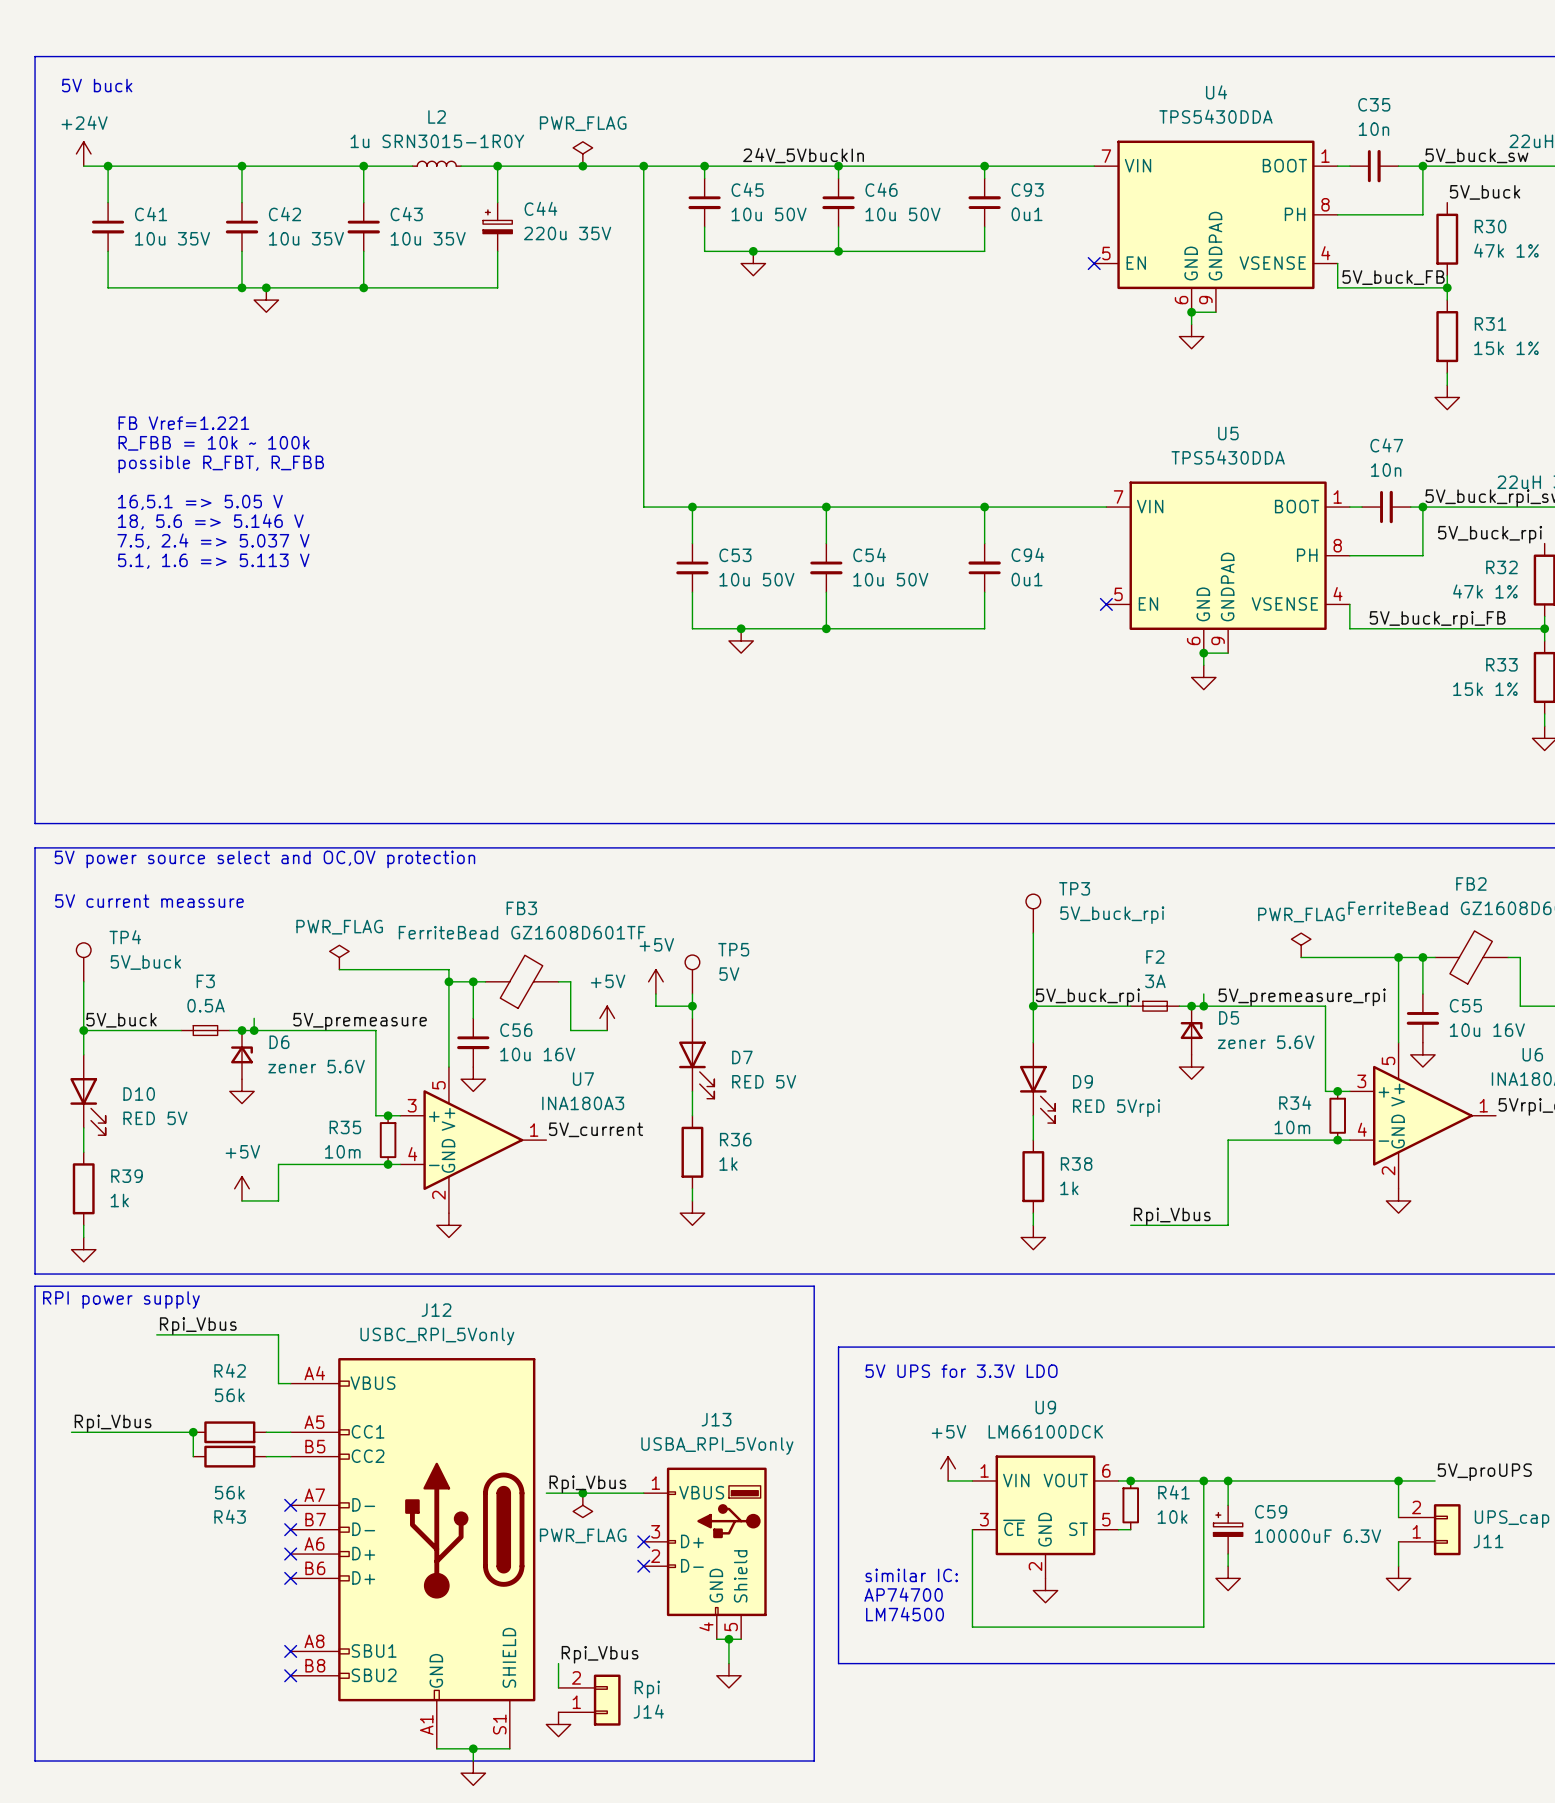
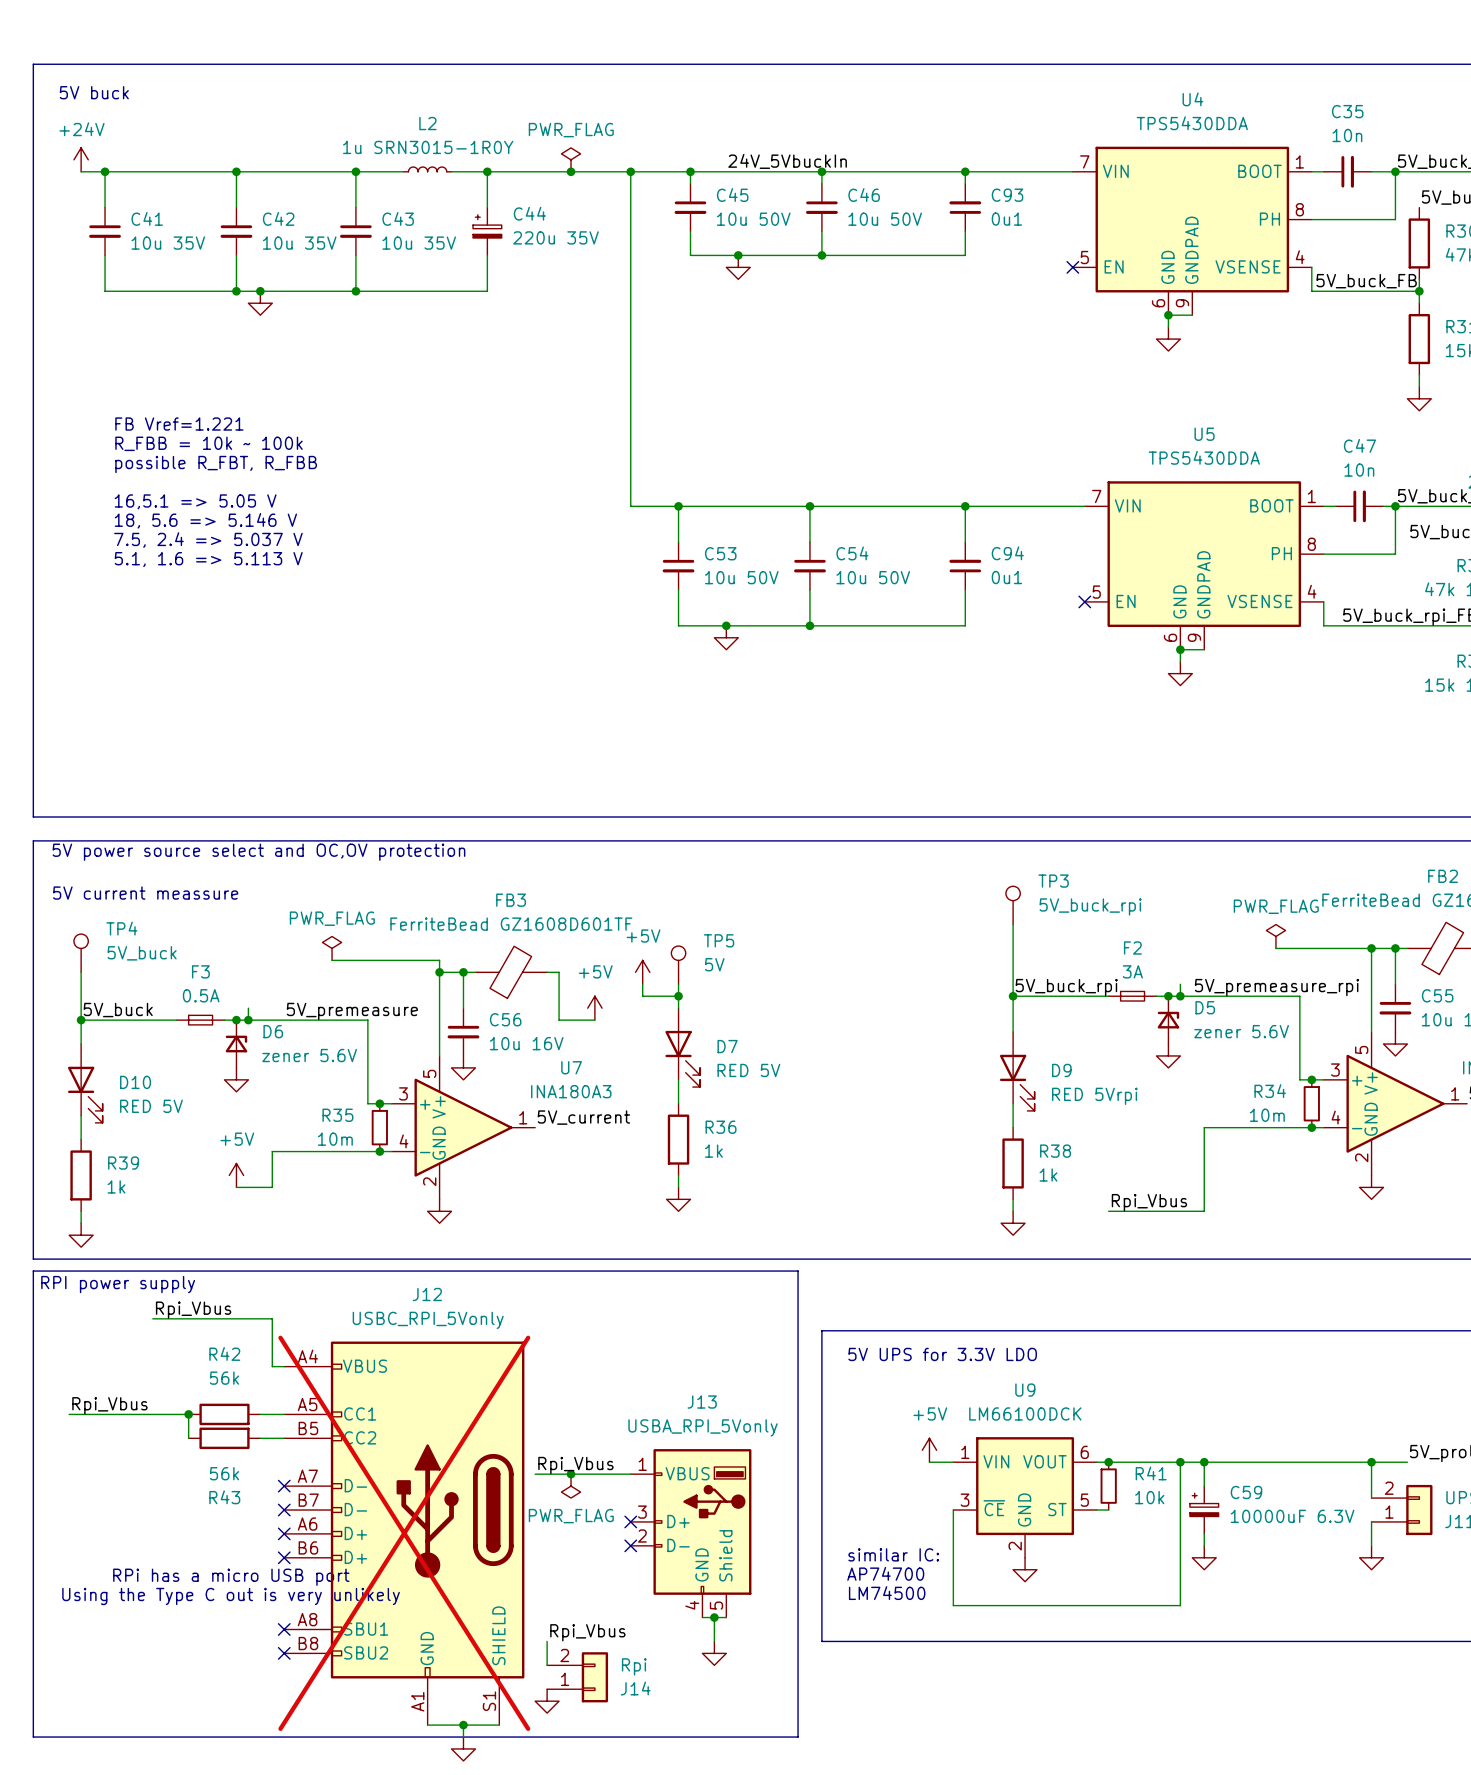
J12 do-not-place cross: none -> (404, 1533)
text: none -> RPi has a micro USB port (231, 1577)
text: none -> Using the Type C out is very unlikely (231, 1596)

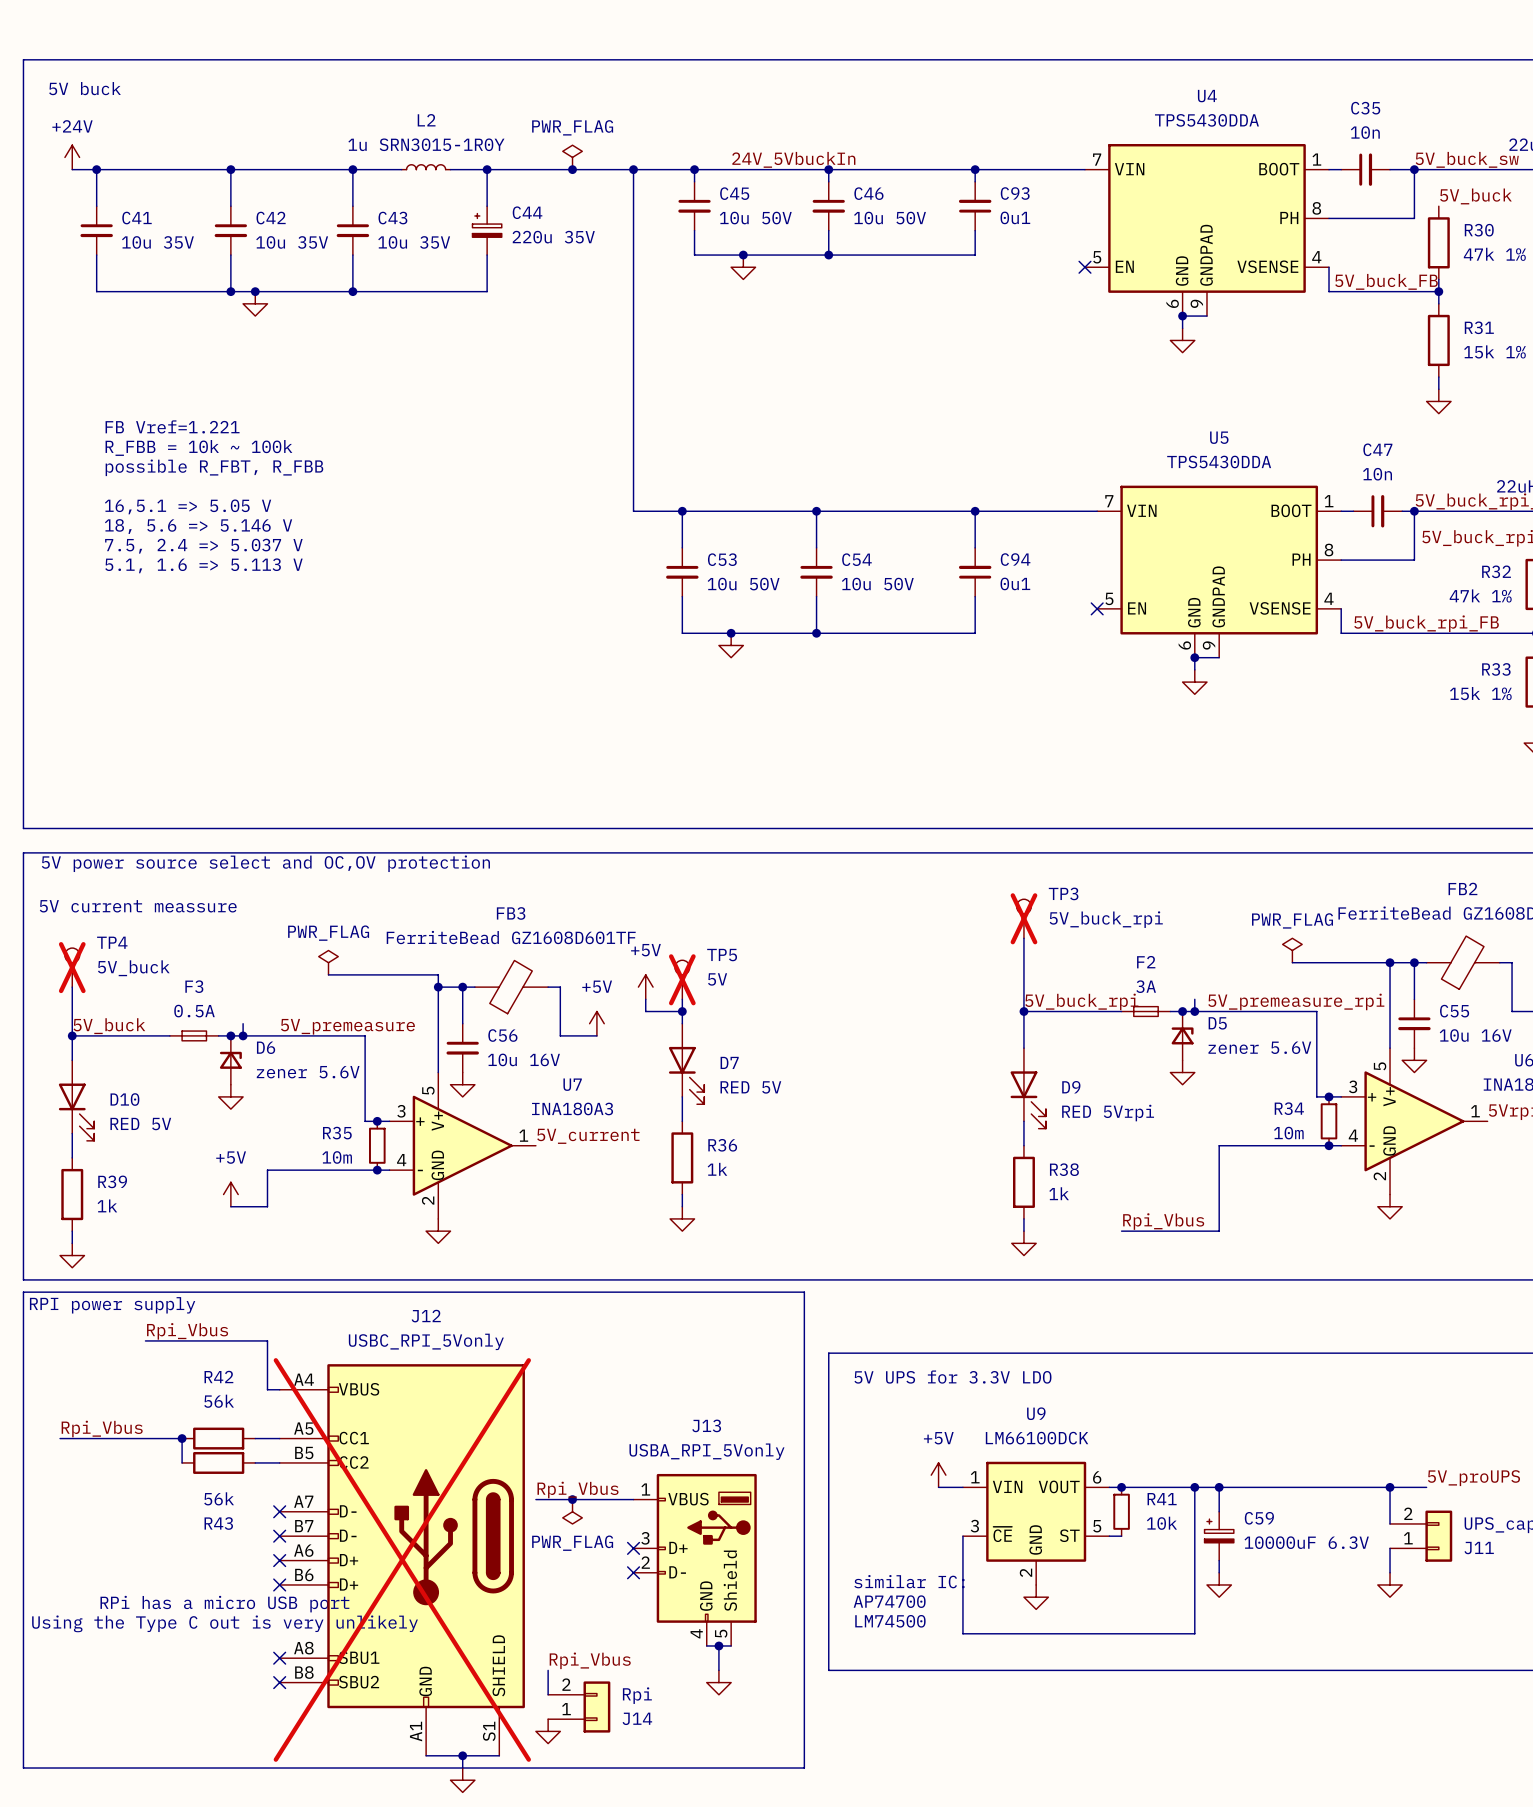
TP3 do-not-place cross: none -> (1023, 918)
TP4 do-not-place cross: none -> (72, 967)
TP5 do-not-place cross: none -> (682, 979)

